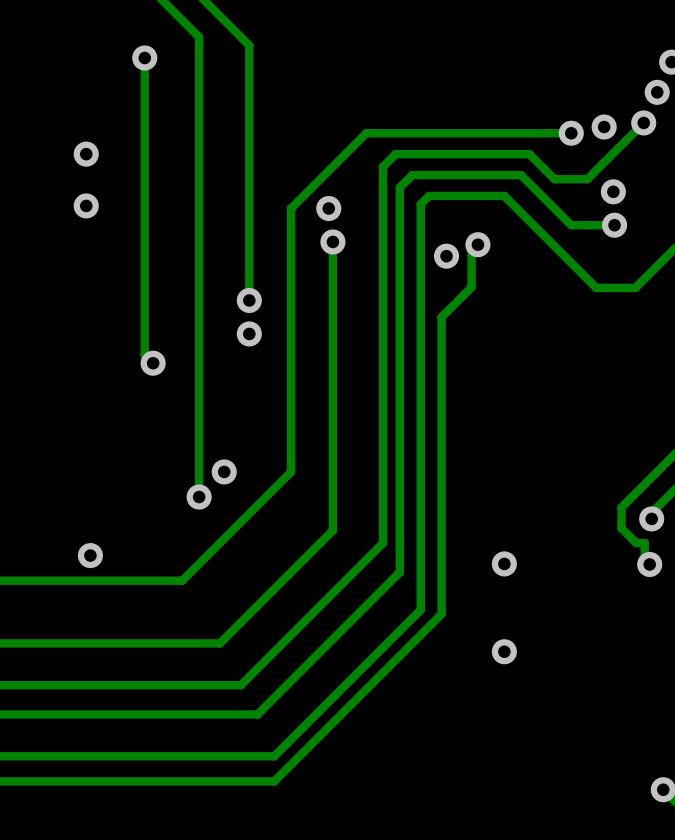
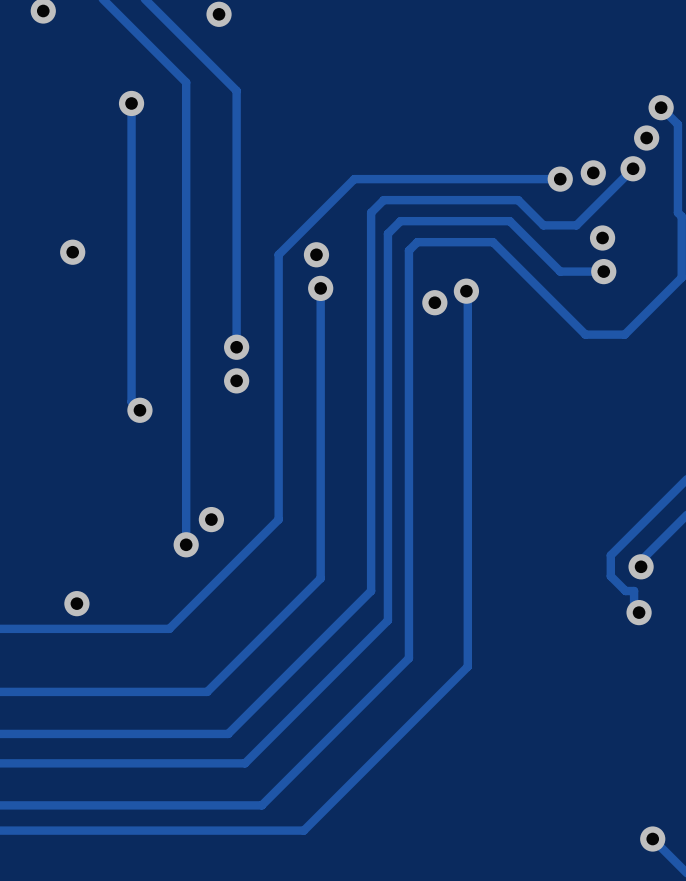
via: (86, 154) -> none
track: (477, 244) (471, 251) (471, 287) (441, 317) (441, 614) (274, 781) -> (466, 291) (467, 666) (303, 830) (261, 830)
via: (504, 563) -> none
via: (504, 651) -> none

